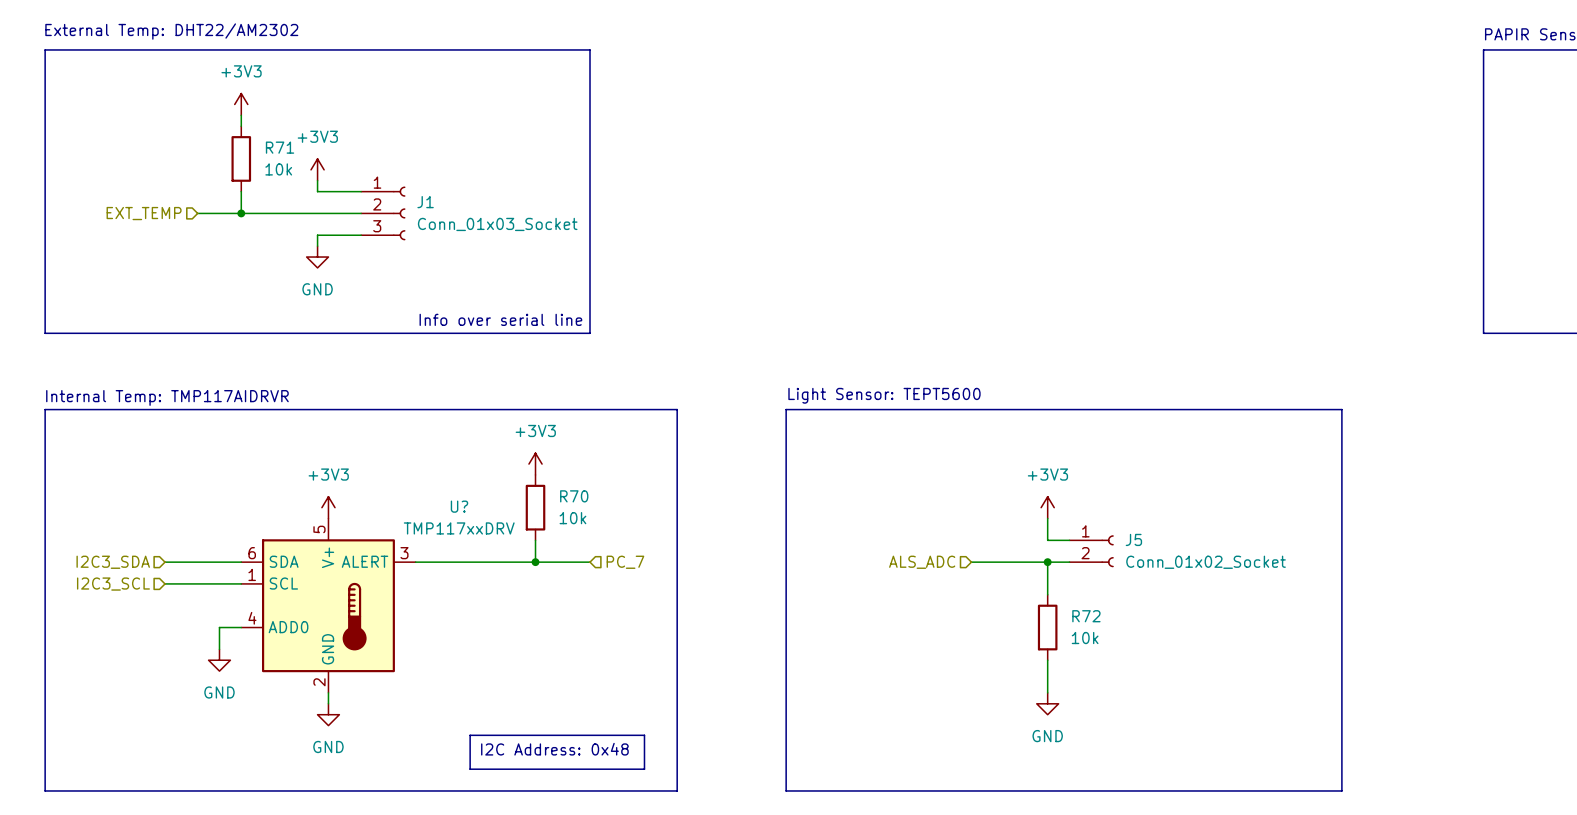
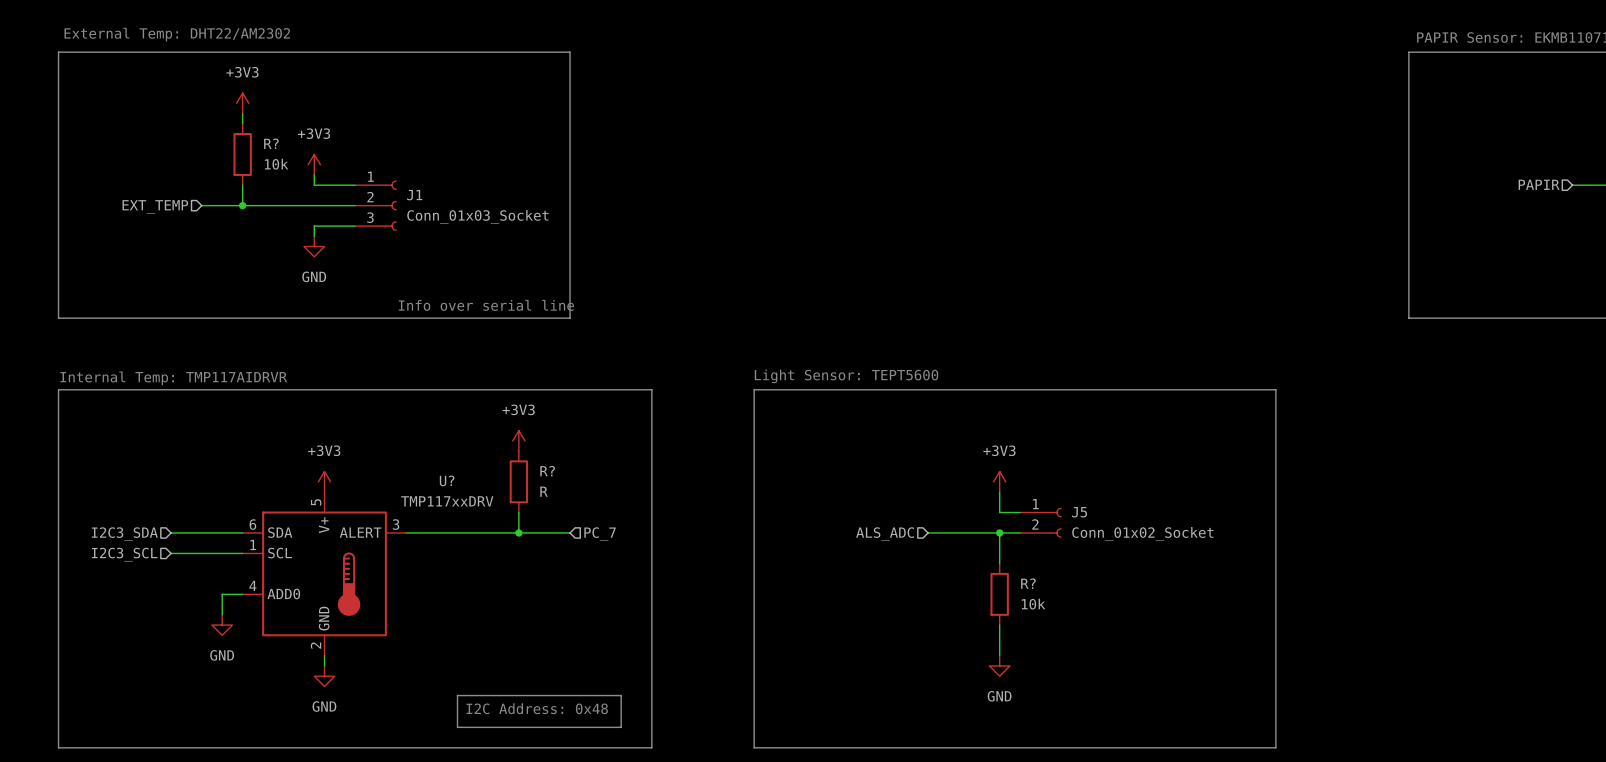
R71 name: R71 (280, 147) -> R? (271, 143)
R70 name: R70 (574, 496) -> R? (547, 471)
R70 value: 10k (572, 518) -> R (544, 491)
R72 name: R72 (1086, 616) -> R? (1028, 583)

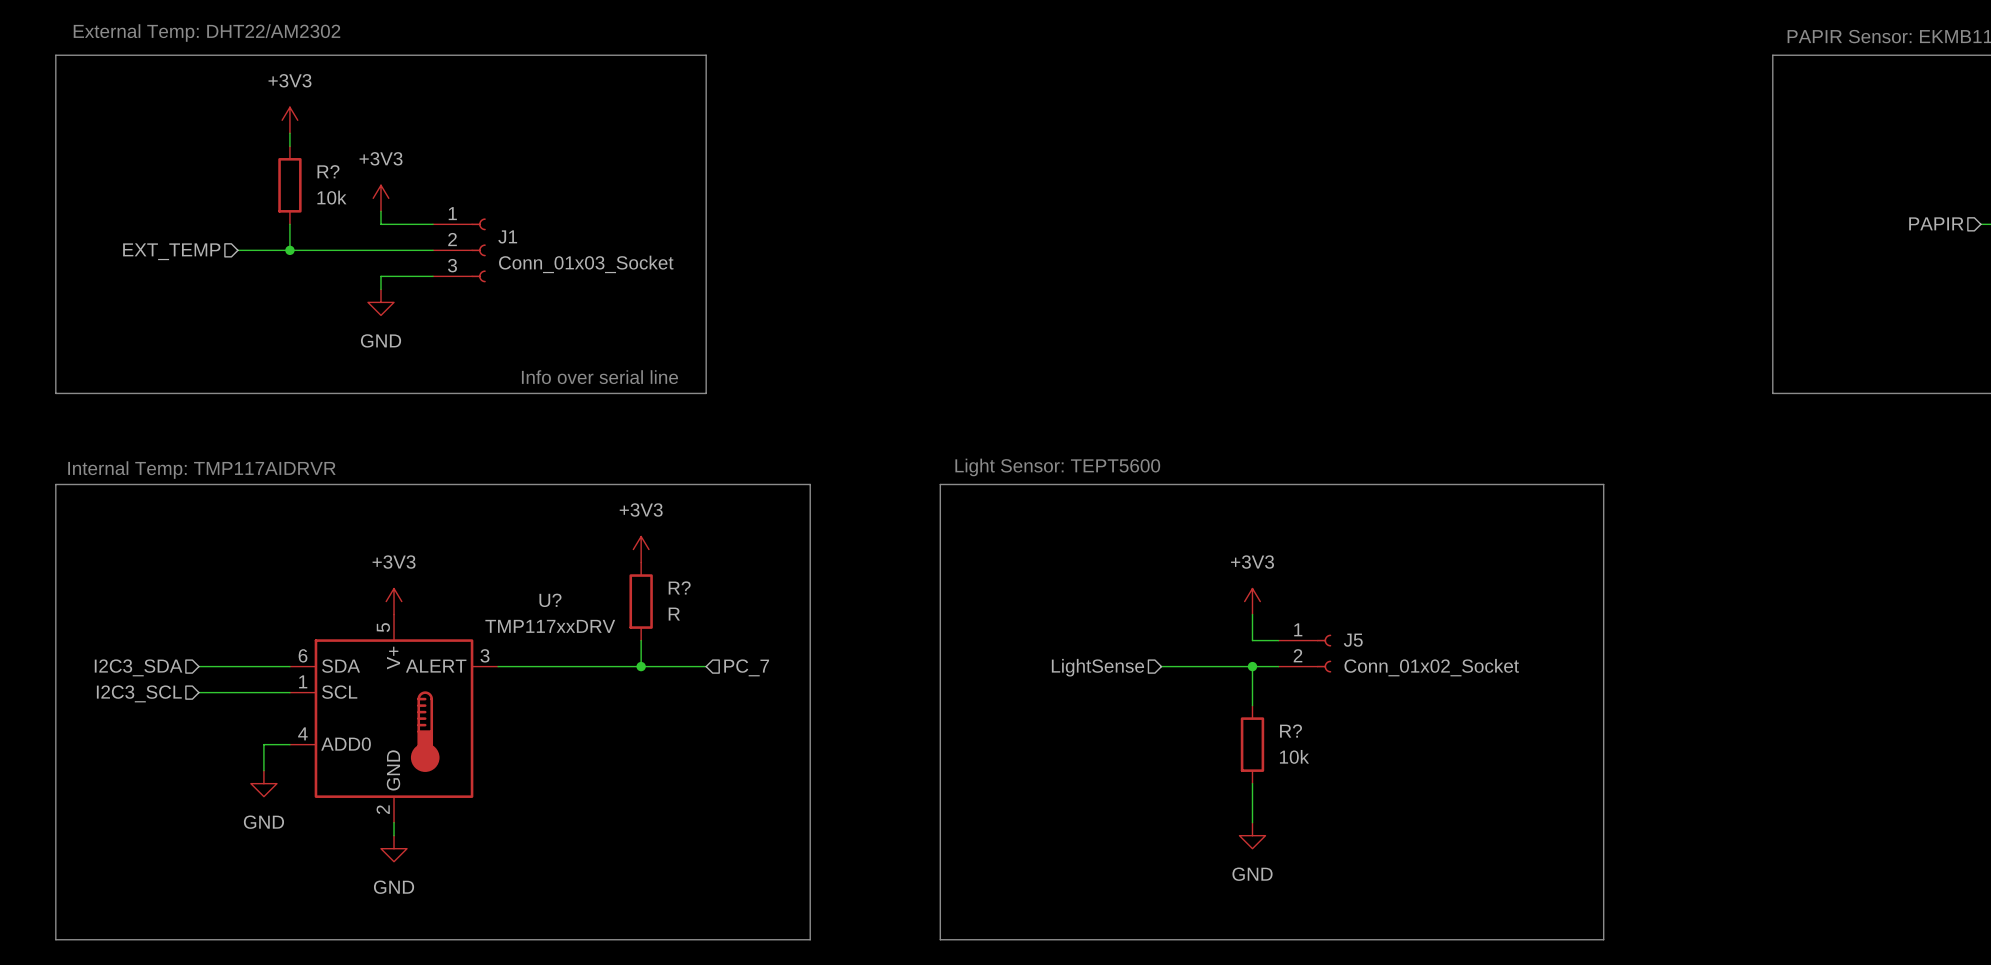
hierarchical label: ALS_ADC (885, 534) -> LightSense (1097, 667)
line: (457, 695) (621, 695) (621, 727) (457, 727) (457, 695) -> none
text: I2C Address: 0x48 (537, 708) -> none

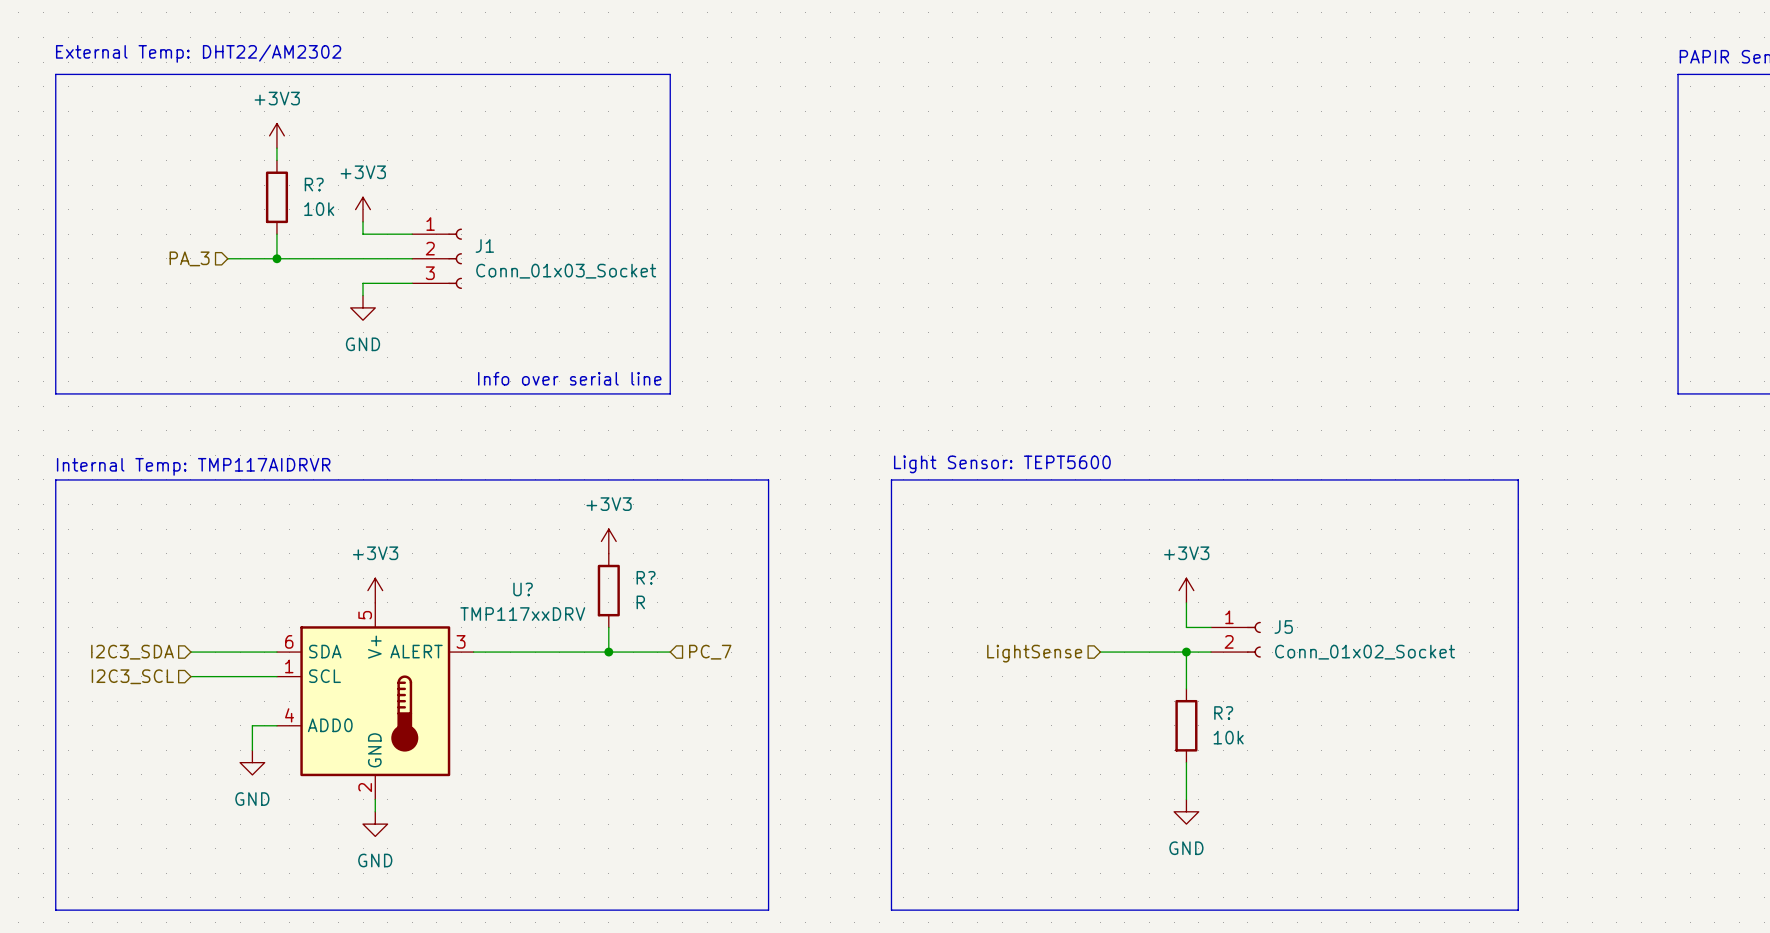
hierarchical label: EXT_TEMP (171, 251) -> PA_3 (189, 258)

